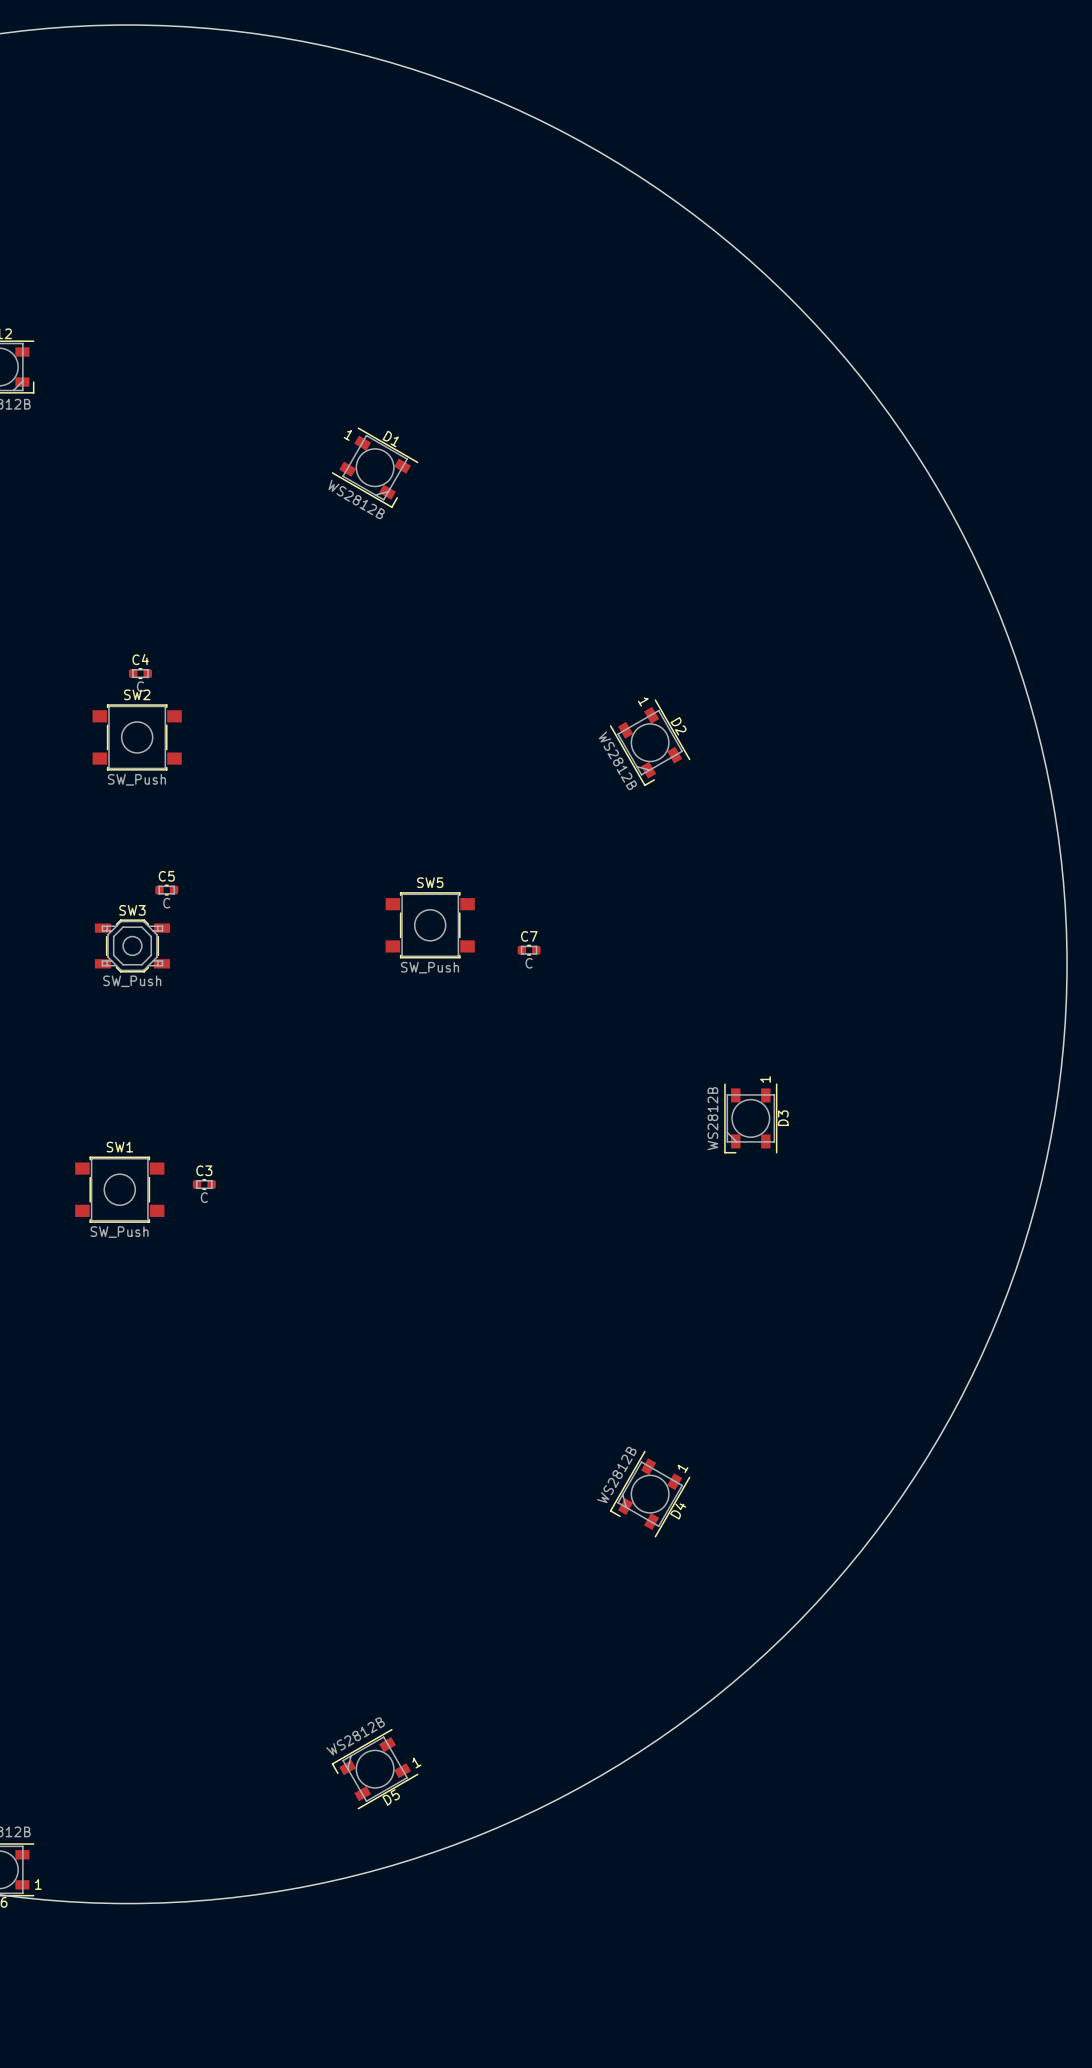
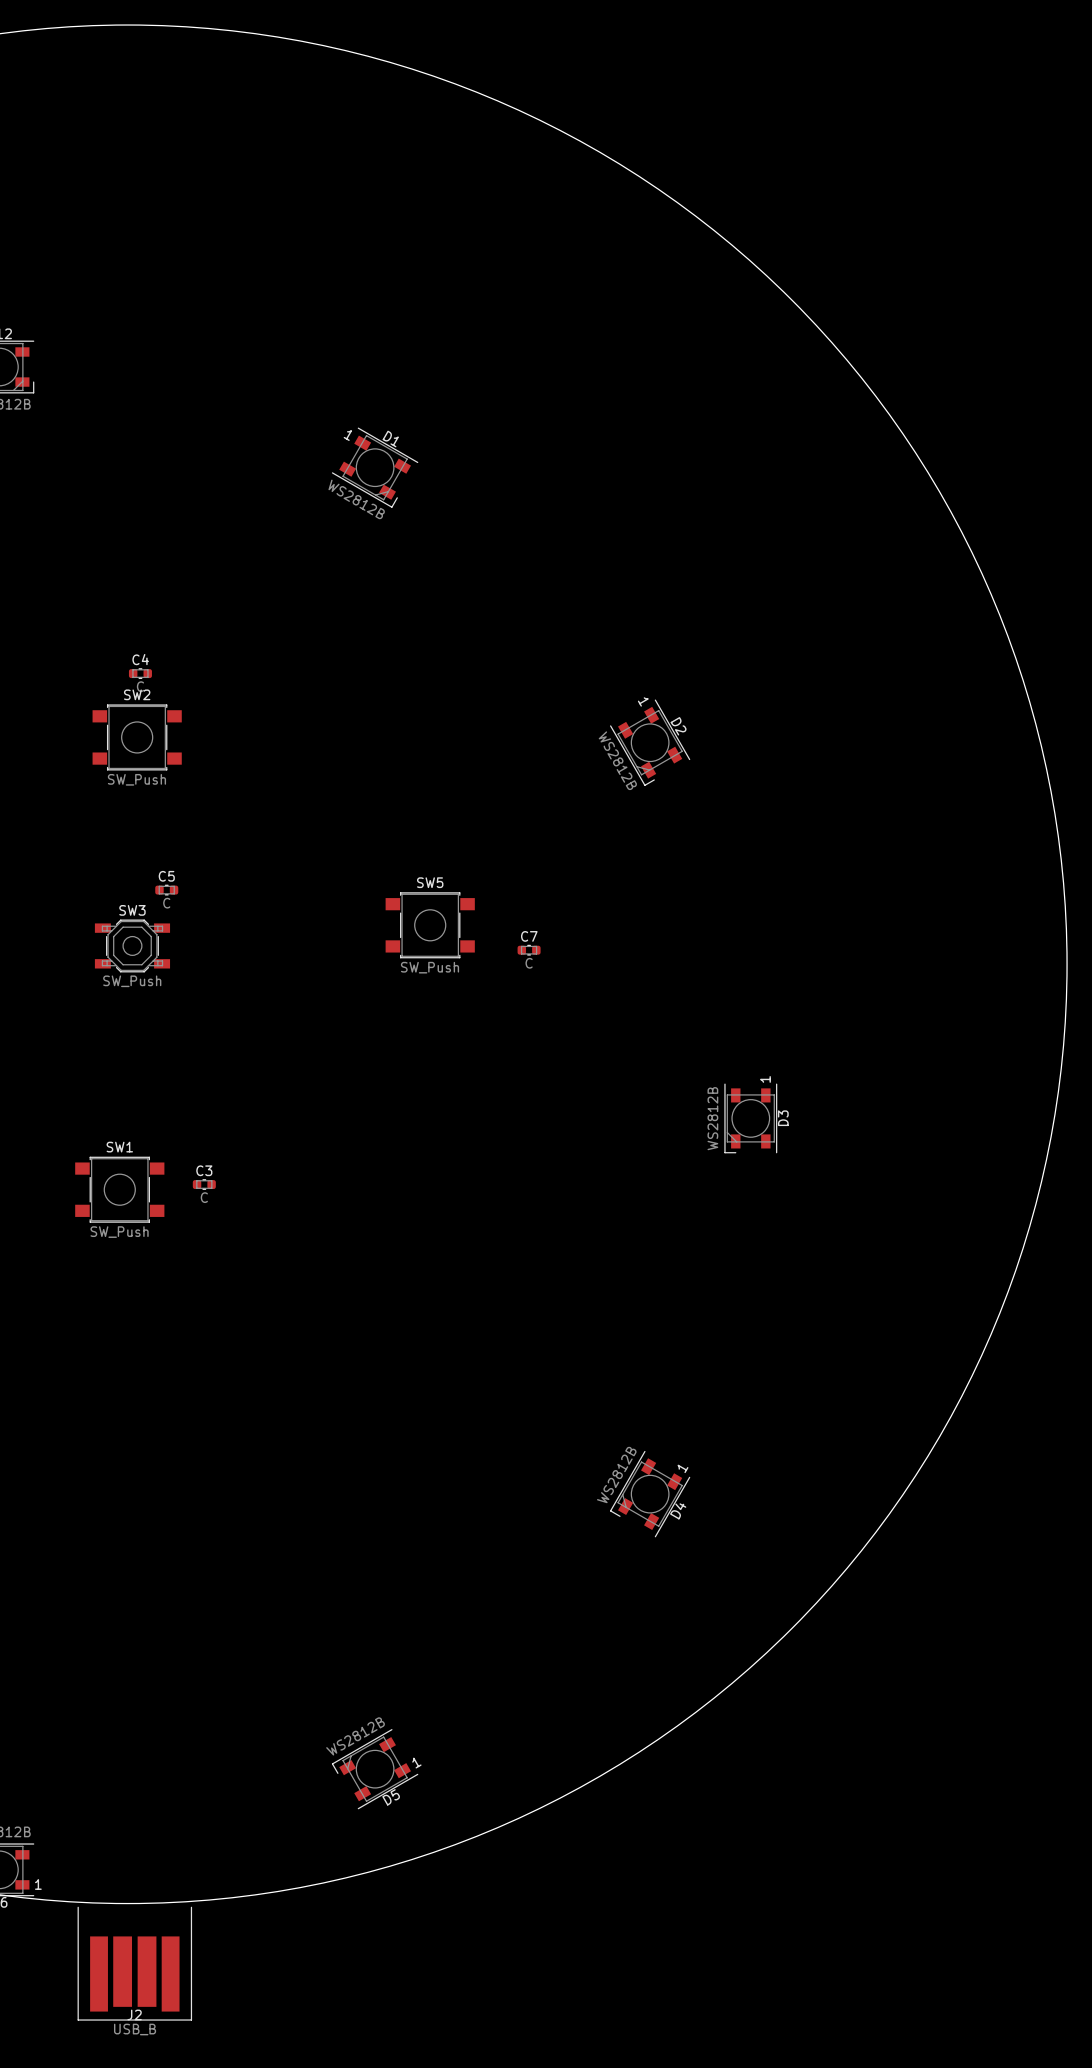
J2: none -> USB_B (134, 1963)

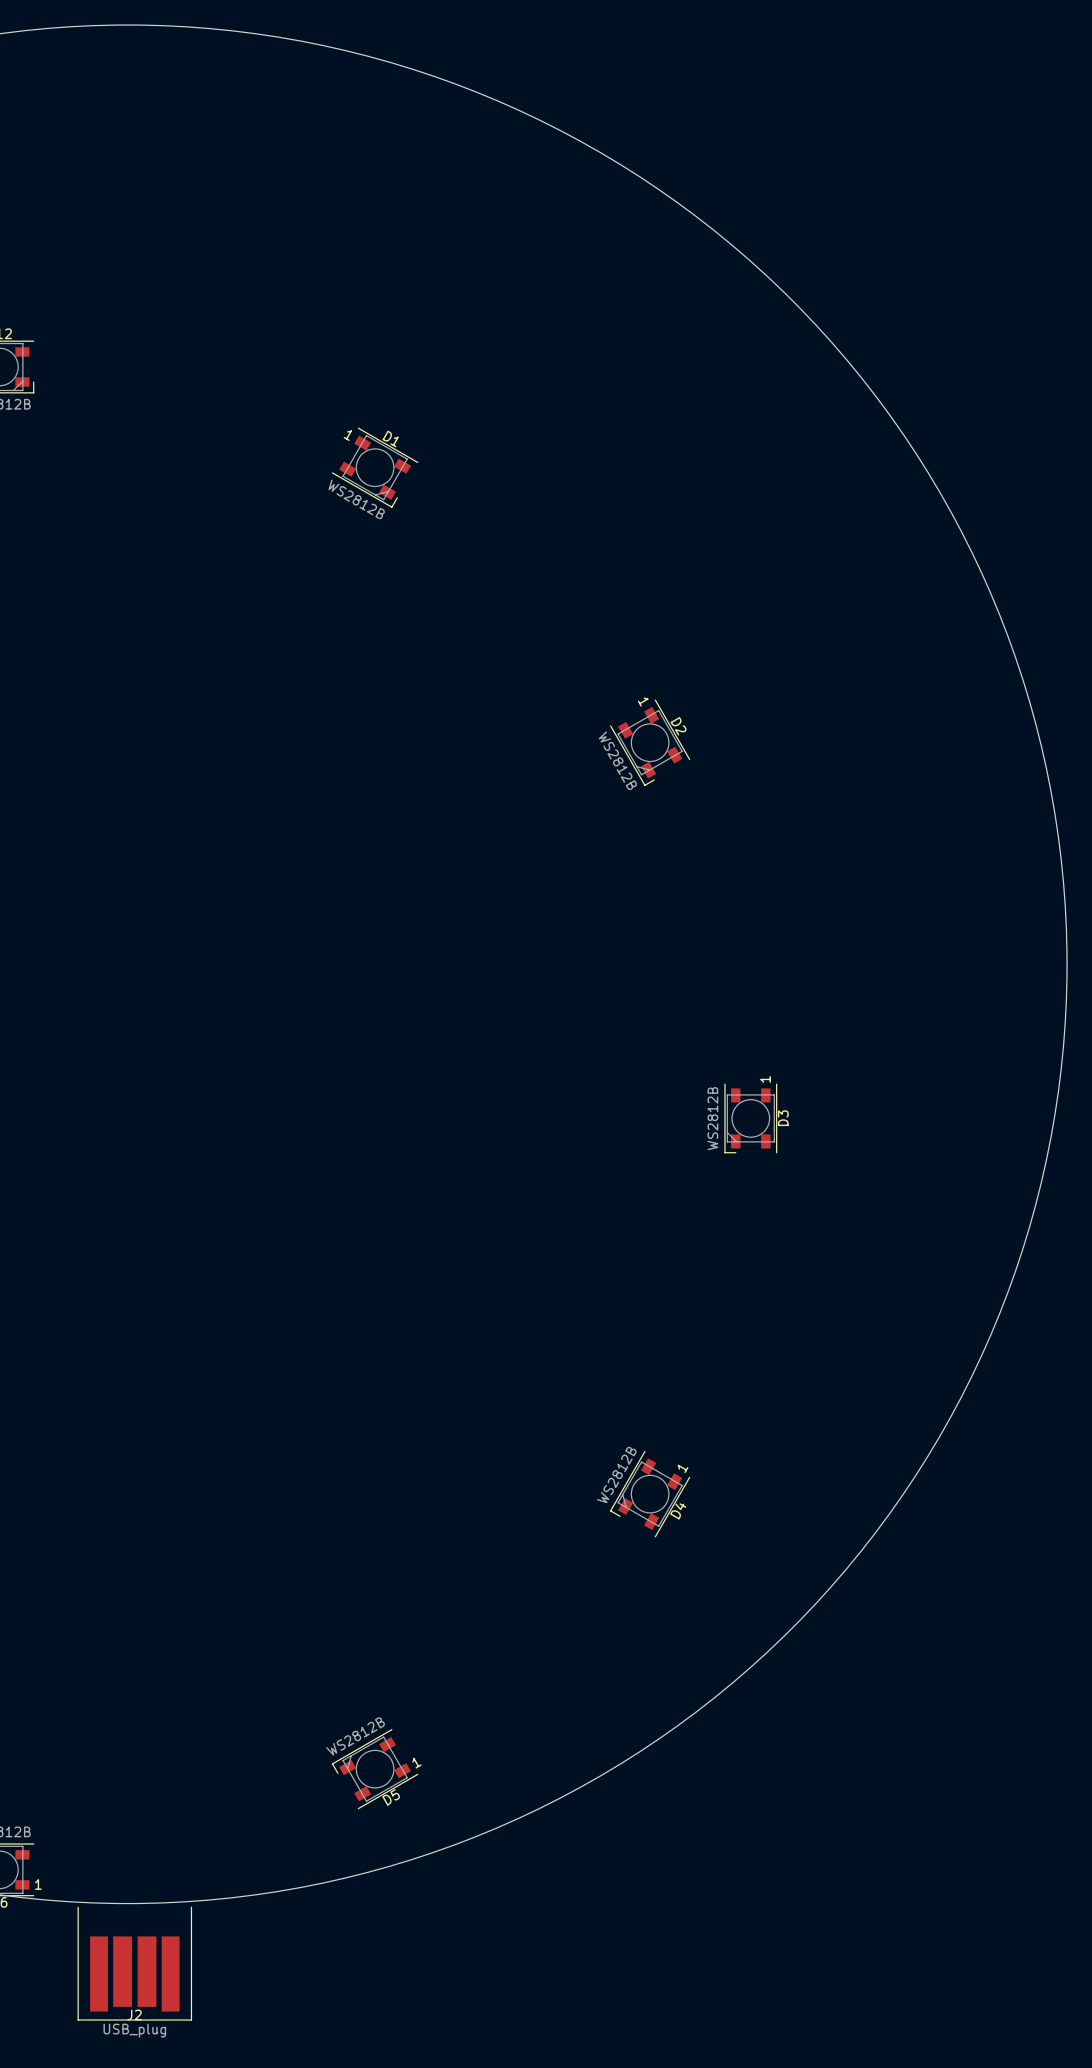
C4: C (140, 673) -> none
SW2: SW_Push (137, 737) -> none
C5: C (166, 890) -> none
SW5: SW_Push (430, 925) -> none
SW3: SW_Push (132, 945) -> none
C7: C (529, 950) -> none
C3: C (204, 1184) -> none
SW1: SW_Push (119, 1189) -> none
J2 value: USB_B (135, 2029) -> USB_plug (134, 2030)

